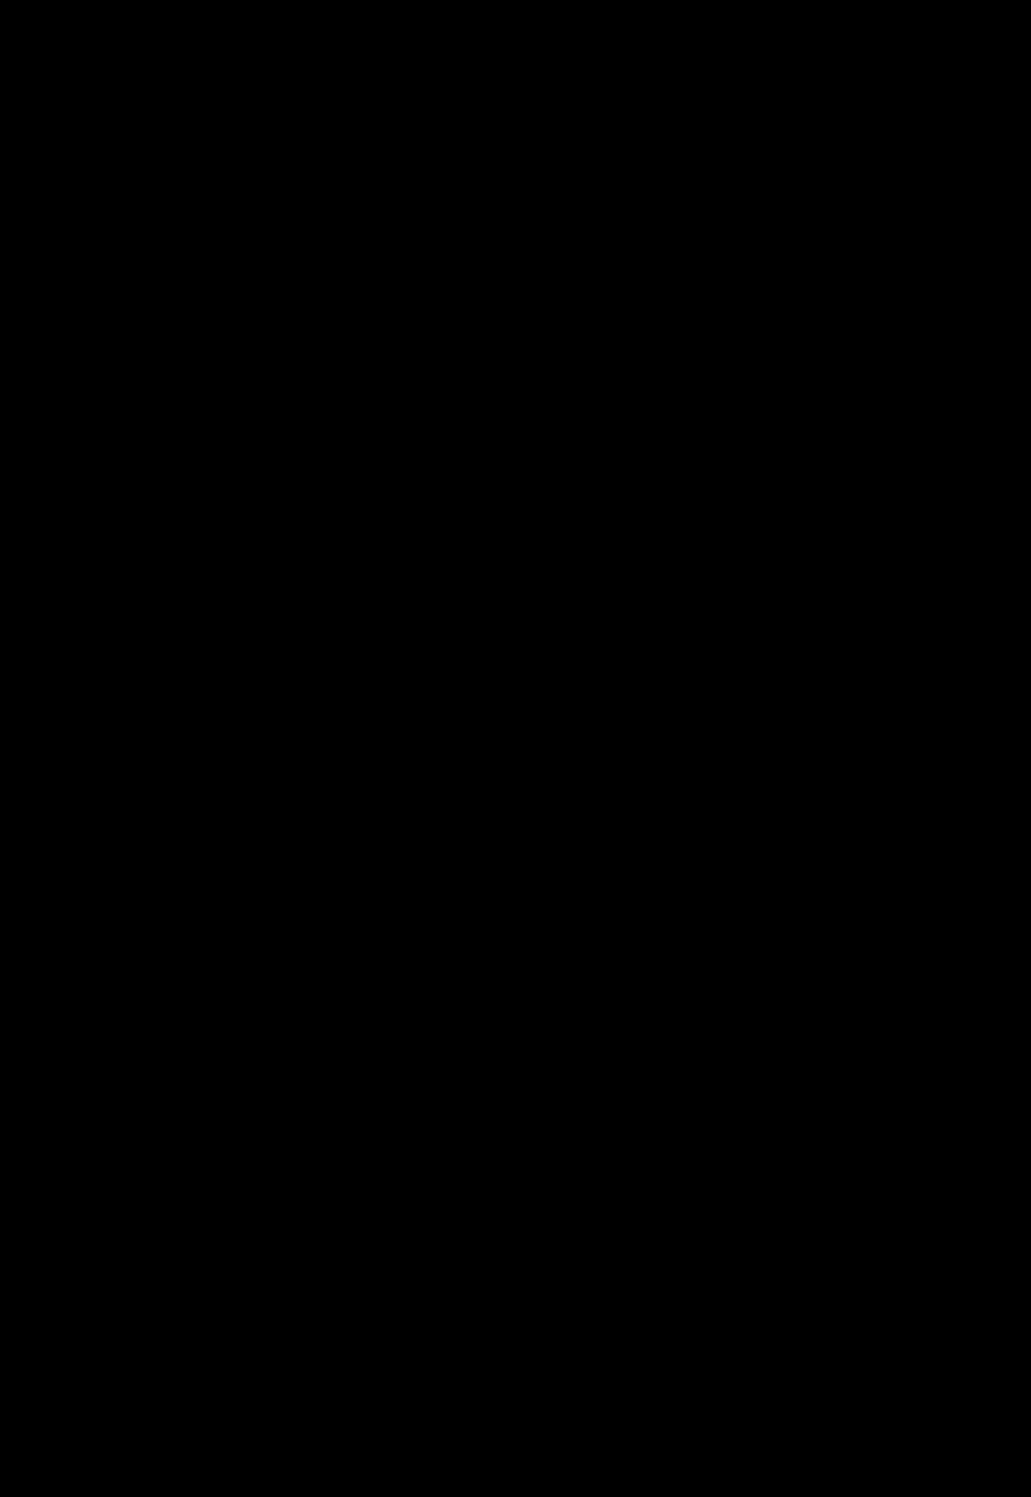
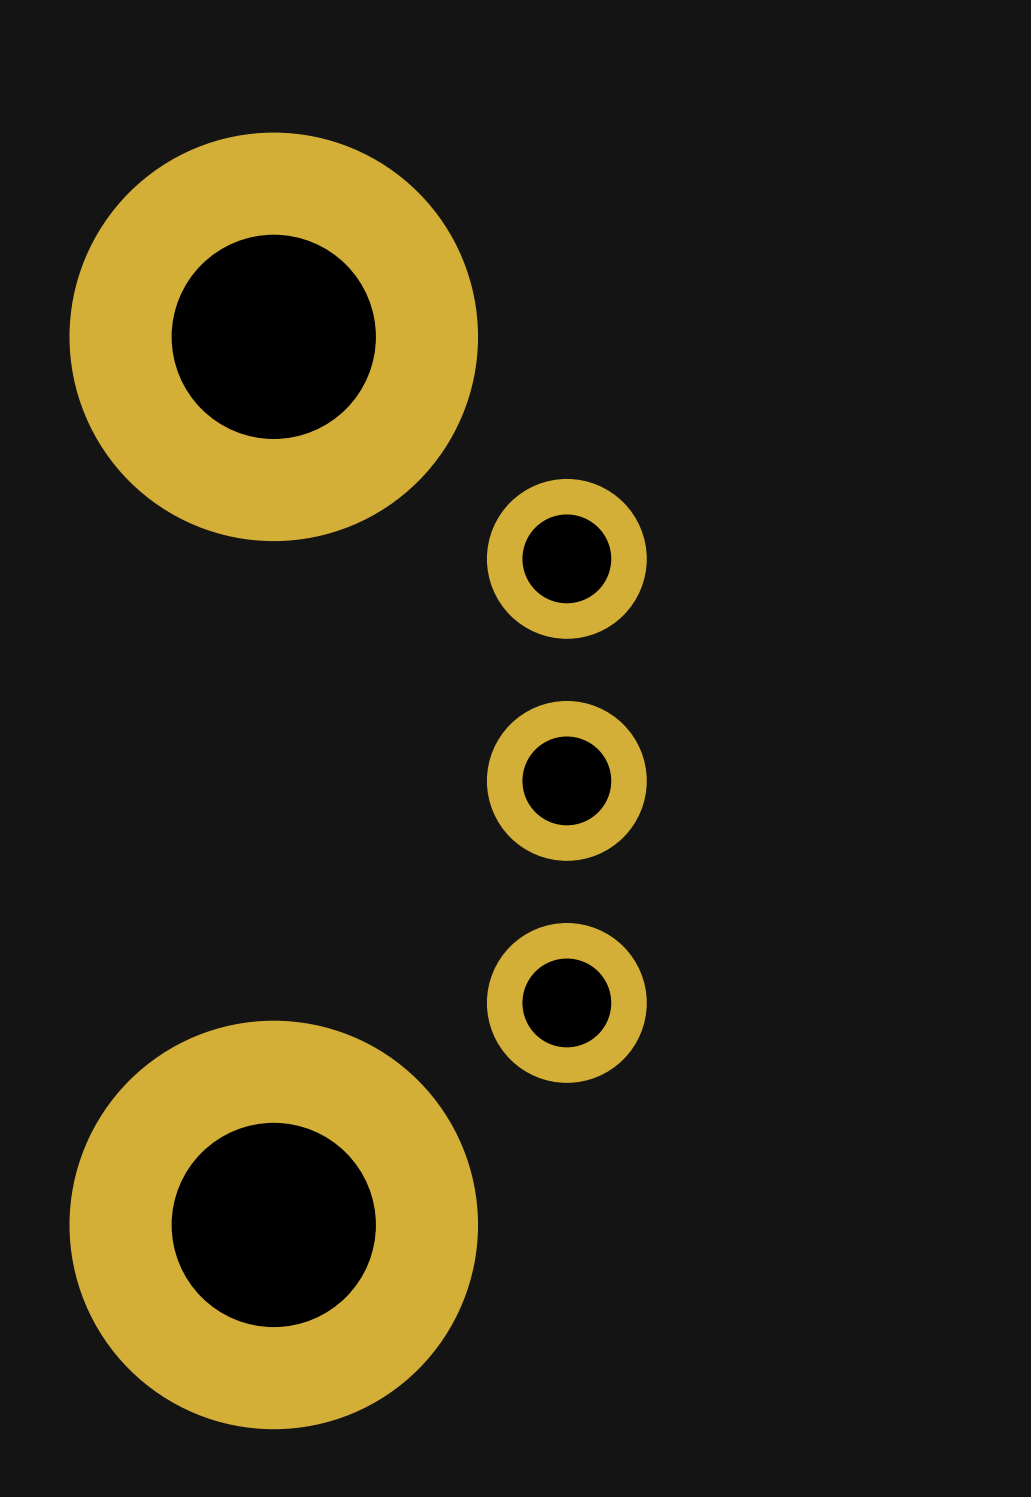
part: none -> (358, 780)

